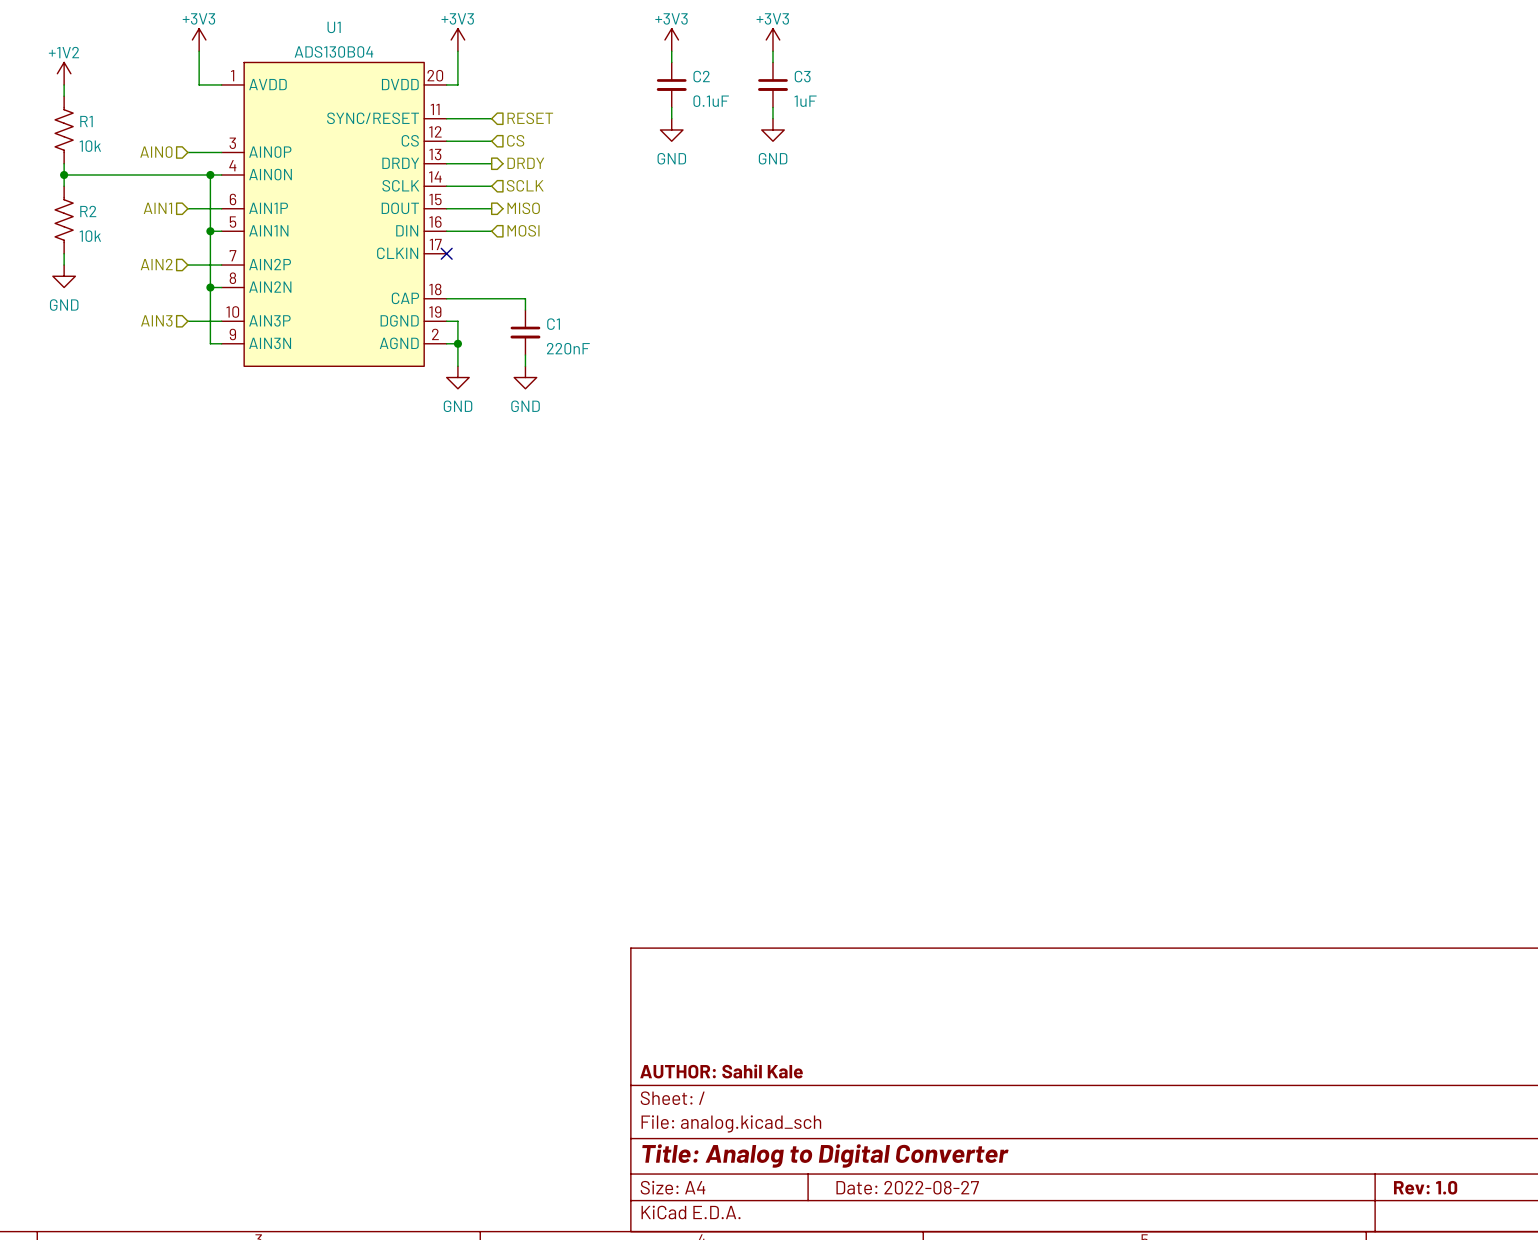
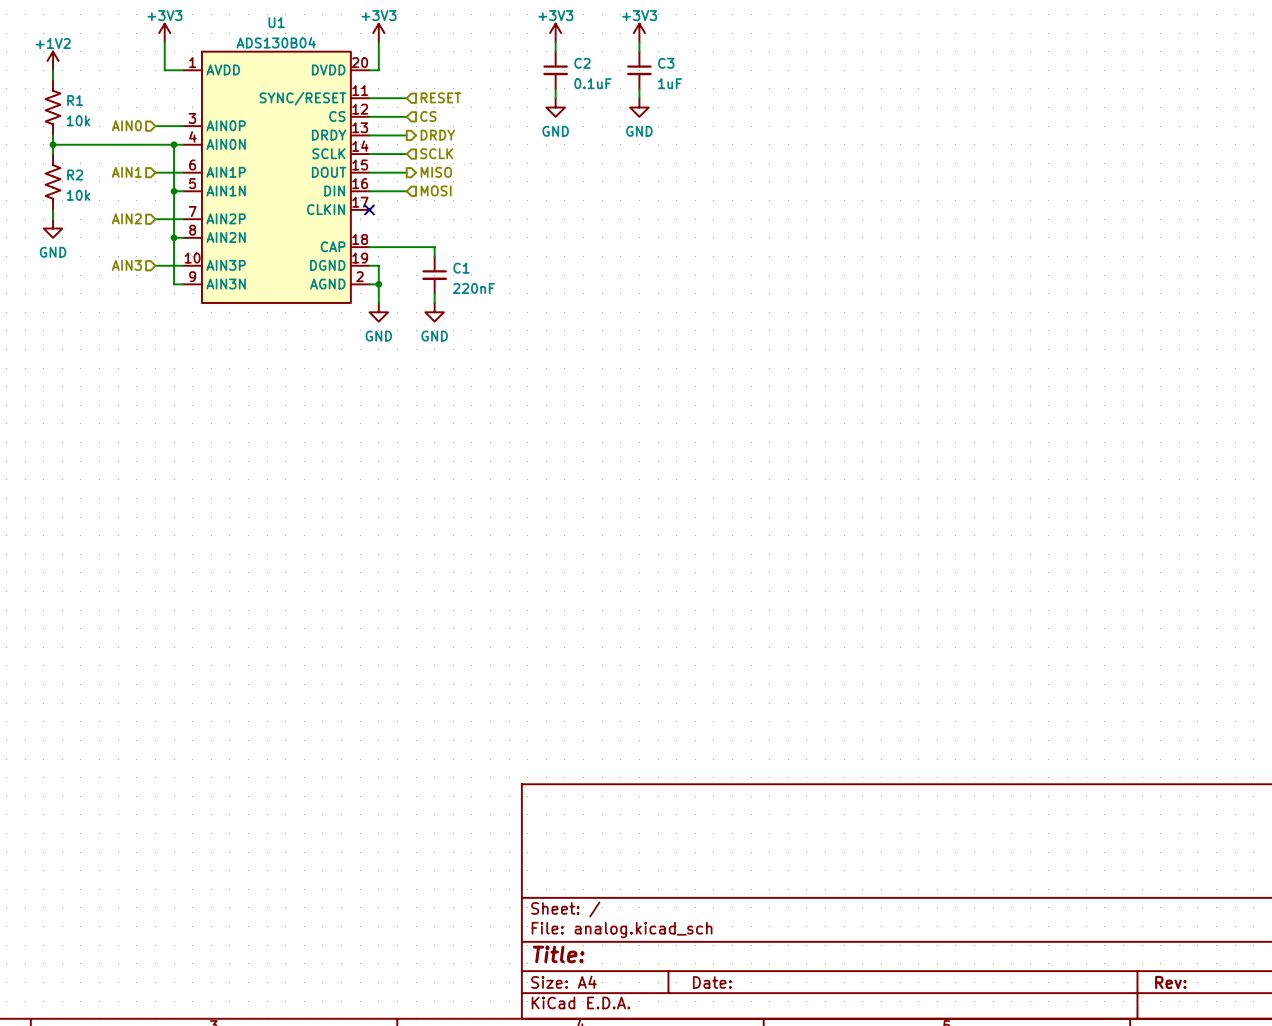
title block: AUTHOR: Sahil Kale (721, 1071) -> none
title block: Title: Analog to Digital Converter (825, 1155) -> Title: (558, 954)
title block: Date: 2022-08-27 (907, 1187) -> Date: (712, 982)
title block: Rev: 1.0 (1425, 1187) -> Rev: (1170, 982)

